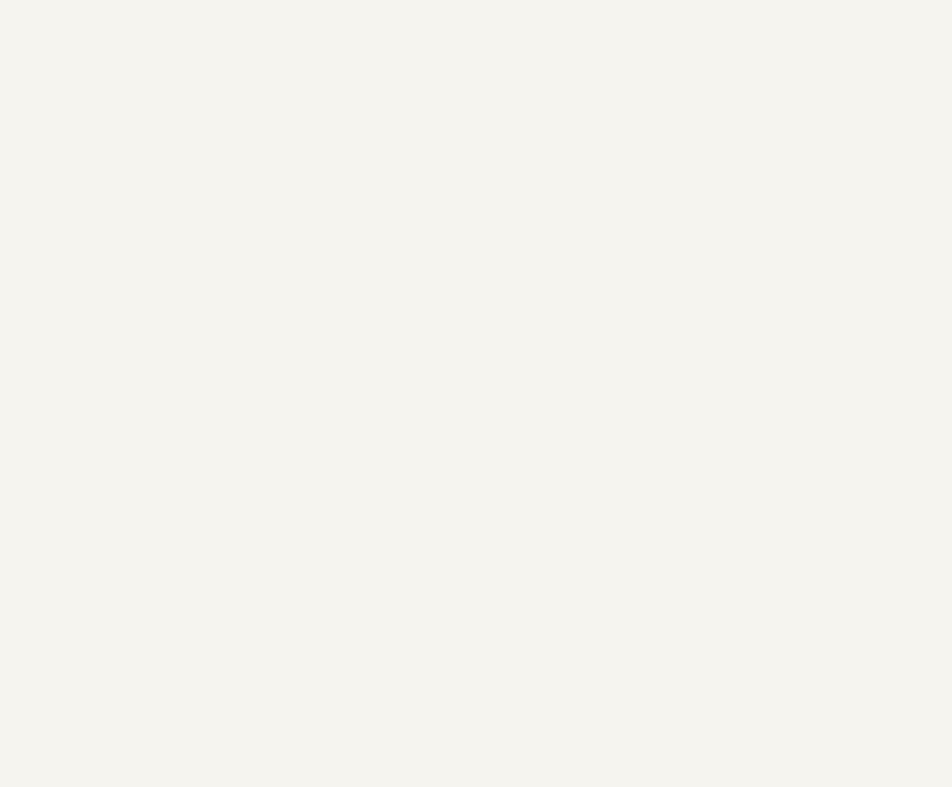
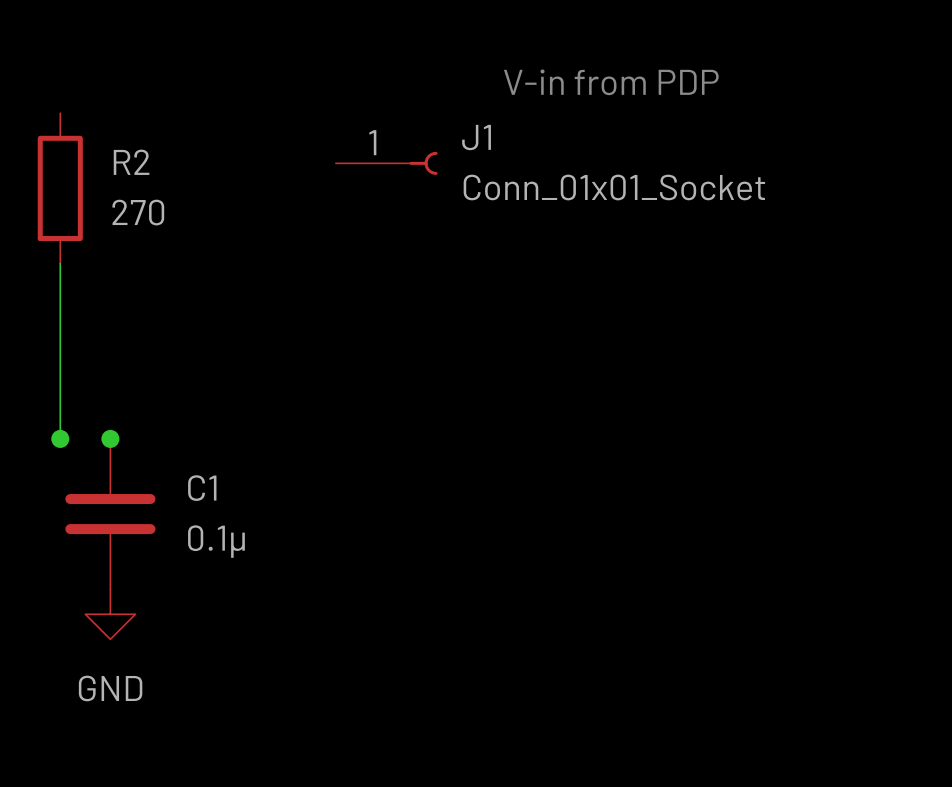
text: none -> V-in from PDP (611, 82)
J1: none -> Conn_01x01_Socket (386, 163)
R2: none -> 270 (60, 188)
wire: none -> (60, 263) (60, 438)
junction: none -> (60, 438)
junction: none -> (110, 438)
C1: none -> 0.1µ (110, 514)
power symbol: none -> GND (110, 614)

